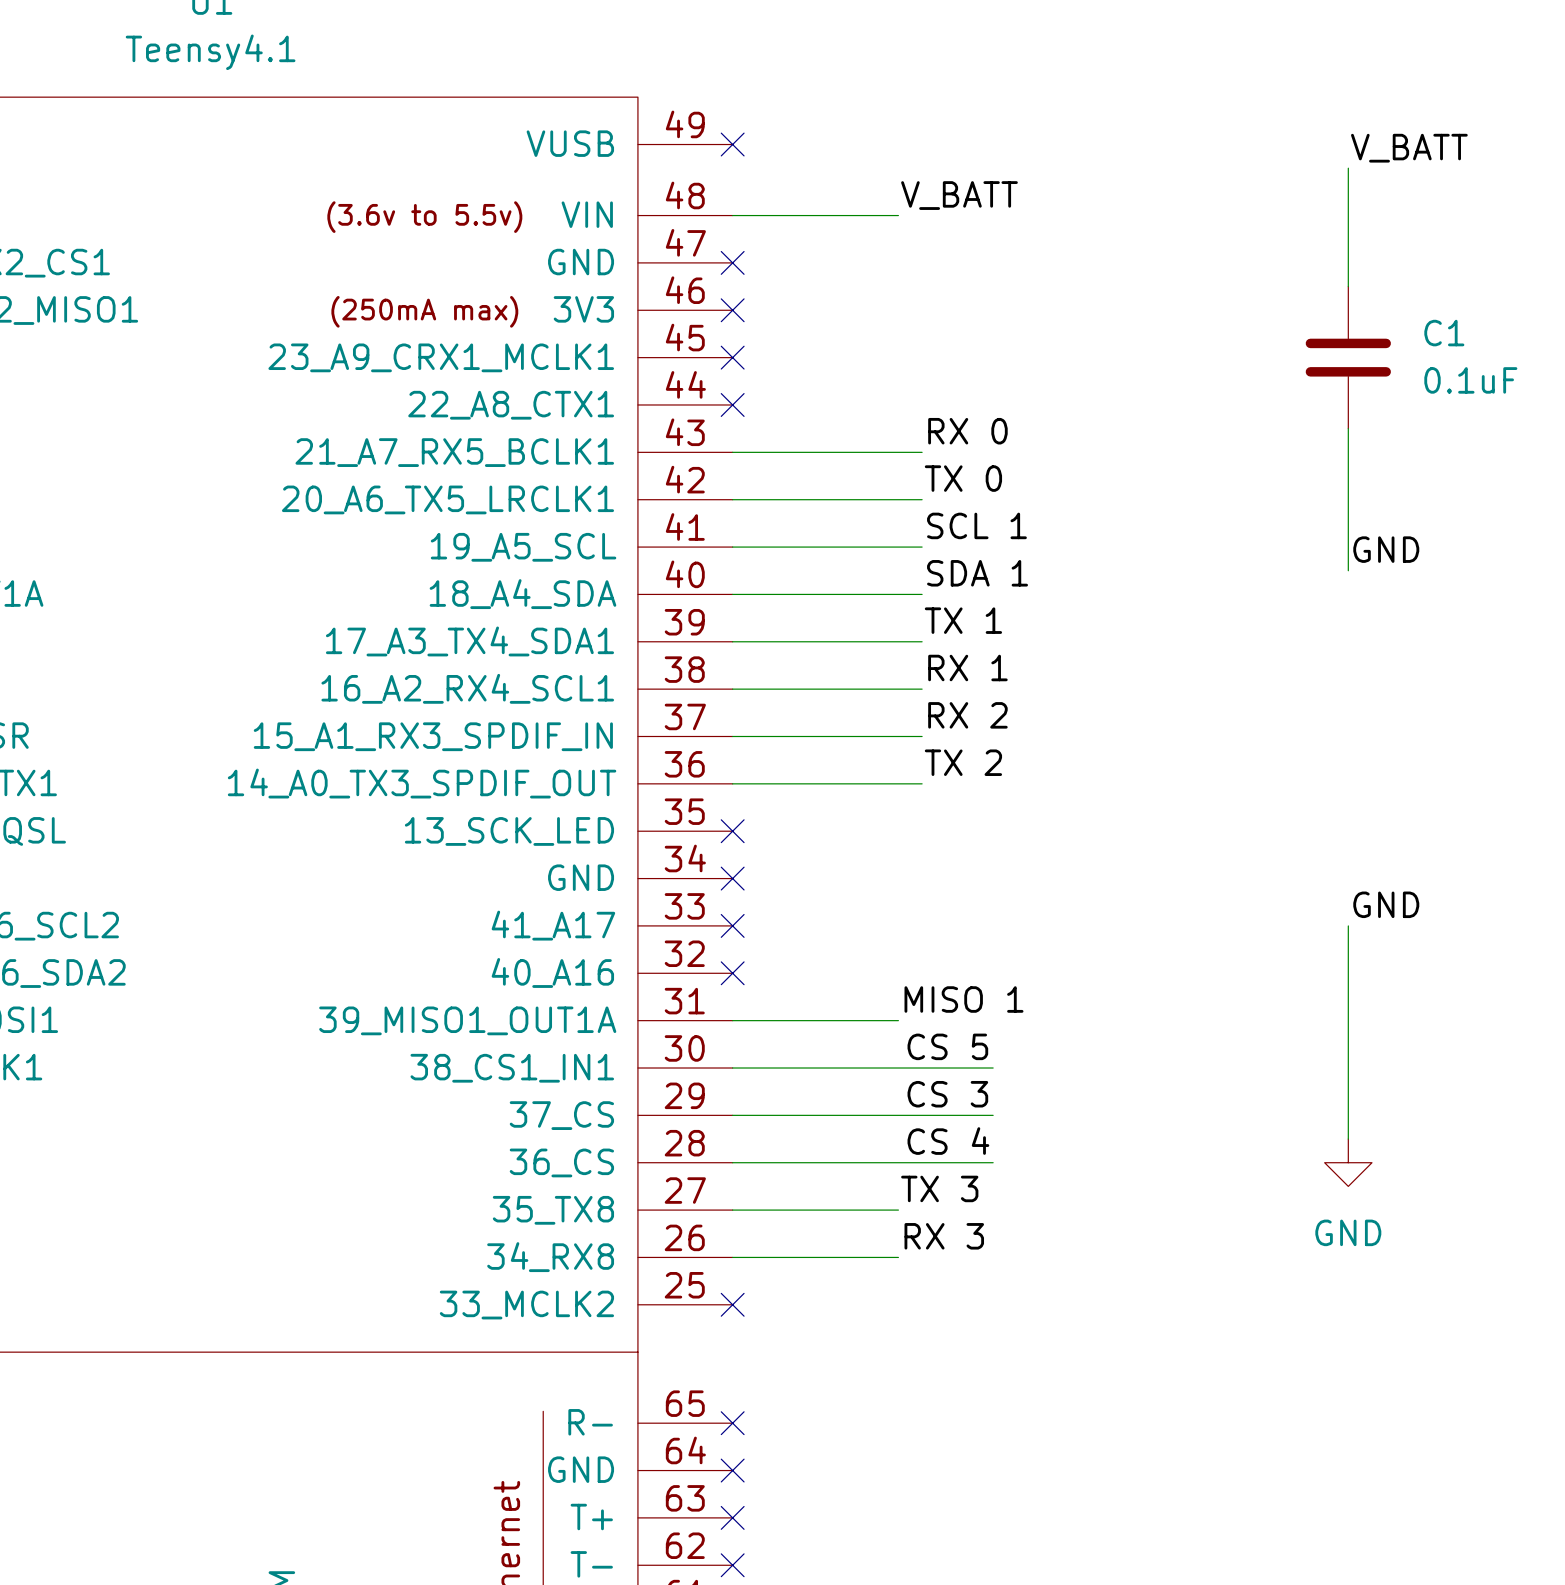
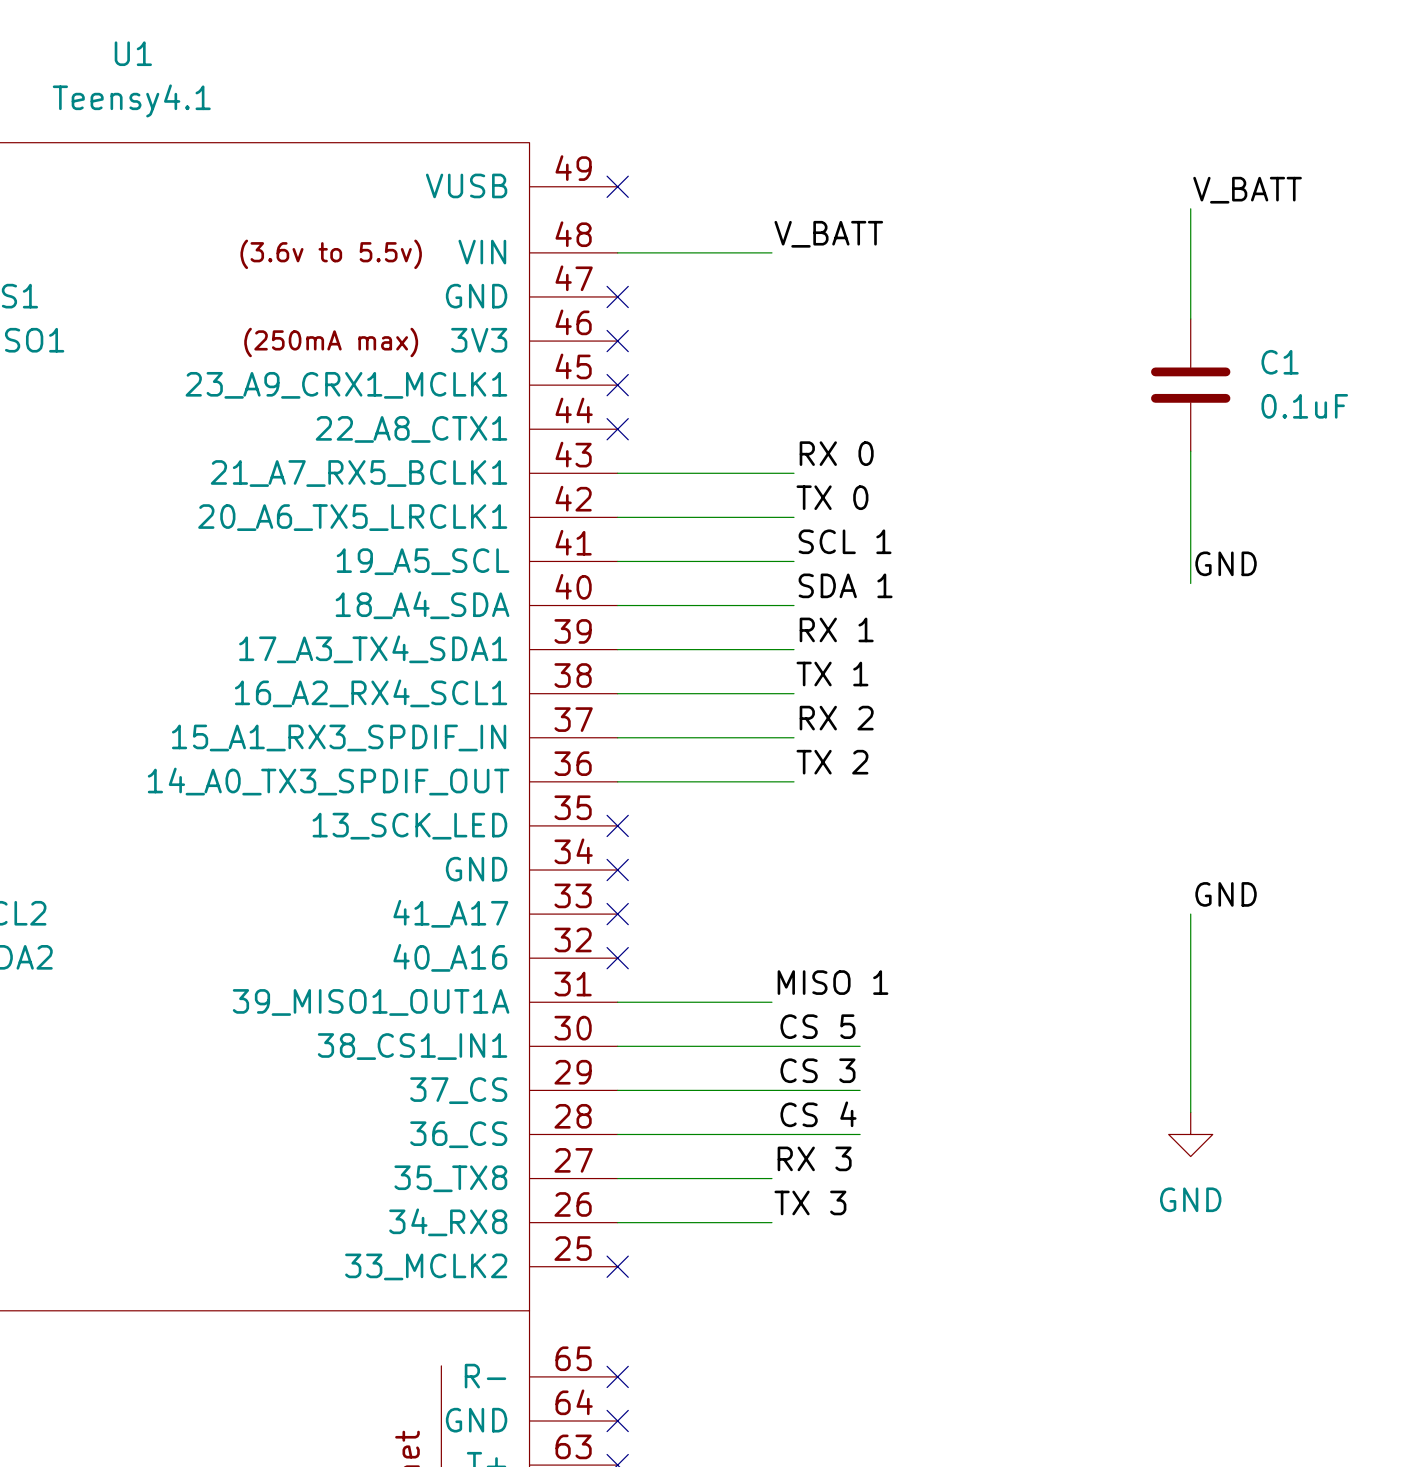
label: TX 1 (963, 620) -> RX 1 (836, 629)
label: RX 1 (967, 668) -> TX 1 (832, 674)
label: TX 3 (939, 1188) -> RX 3 (814, 1158)
label: RX 3 (944, 1236) -> TX 3 (810, 1202)

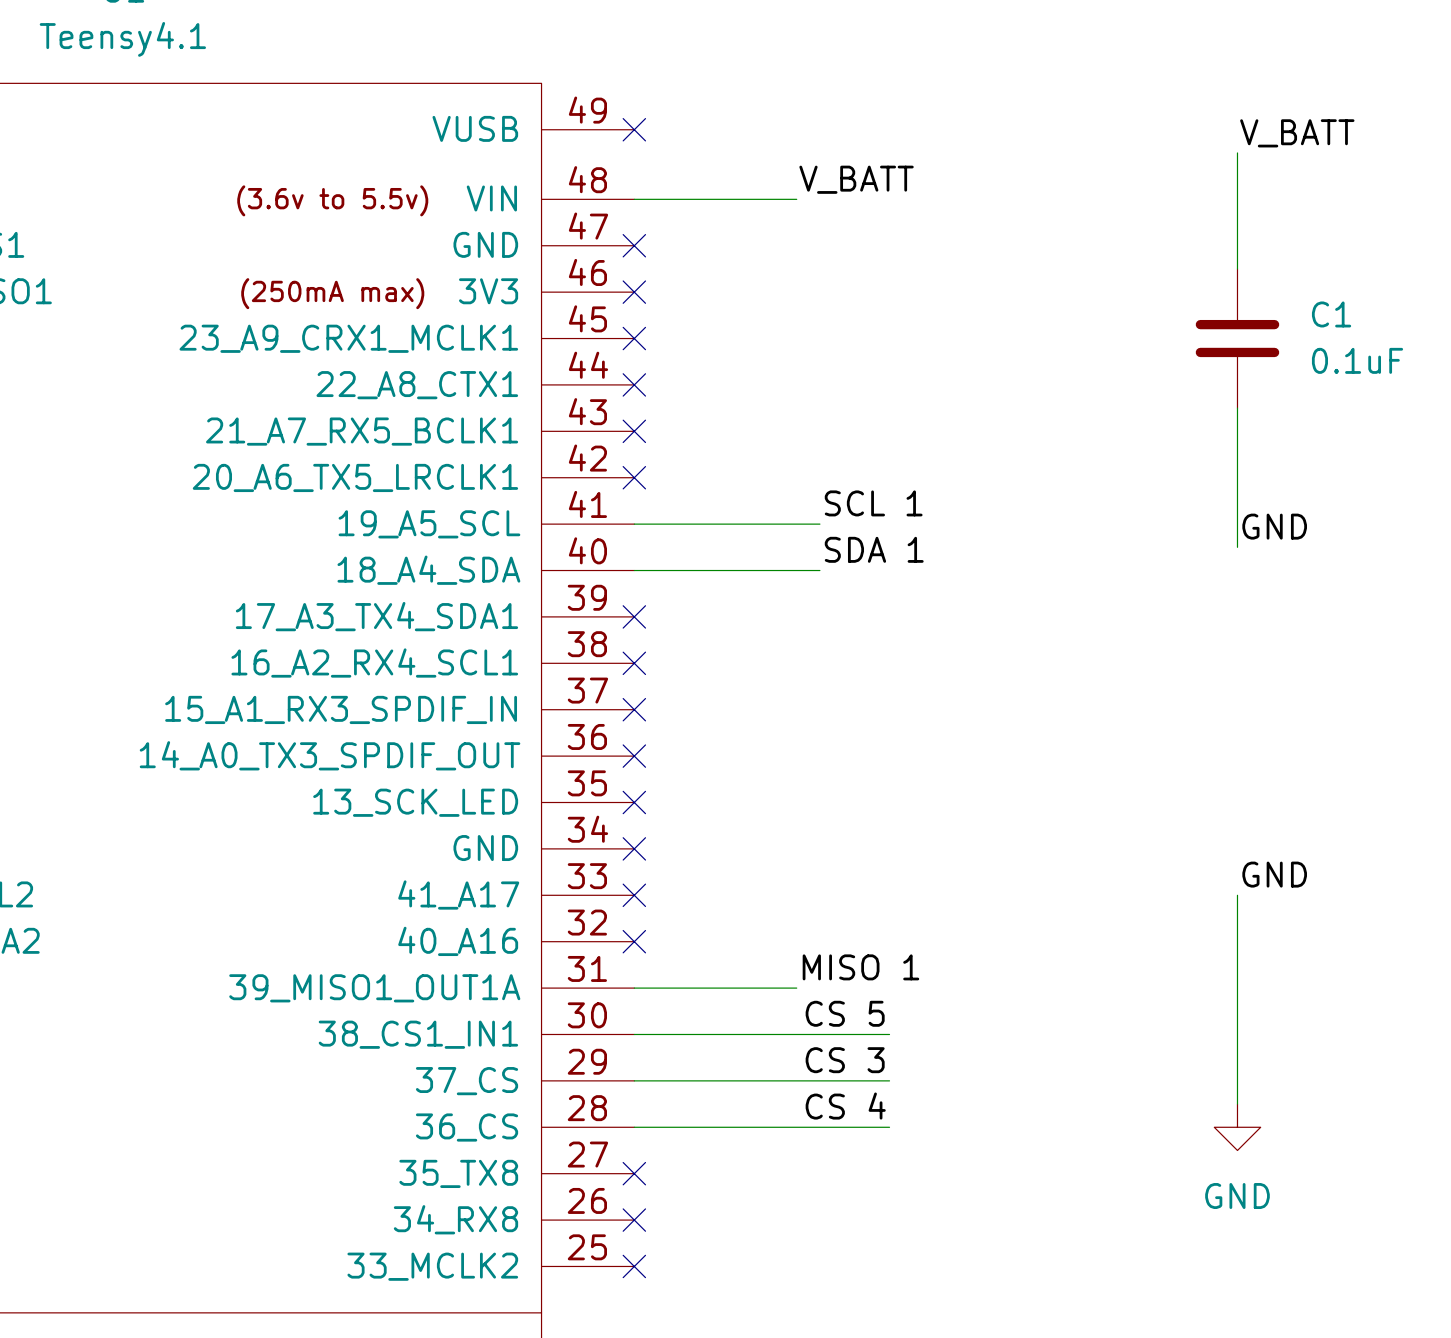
label: RX 0 (836, 453) -> none
wire: (617, 473) (794, 473) -> none
no-connect mark: none -> (634, 431)
label: TX 0 (832, 497) -> none
wire: (617, 517) (794, 517) -> none
no-connect mark: none -> (634, 477)
label: RX 1 (836, 629) -> none
wire: (617, 649) (794, 649) -> none
no-connect mark: none -> (634, 616)
label: TX 1 (832, 674) -> none
wire: (617, 693) (794, 693) -> none
no-connect mark: none -> (634, 663)
label: RX 2 (836, 718) -> none
wire: (617, 737) (794, 737) -> none
no-connect mark: none -> (634, 709)
label: TX 2 (832, 762) -> none
wire: (617, 781) (794, 781) -> none
no-connect mark: none -> (634, 756)
label: RX 3 (814, 1158) -> none
wire: (617, 1178) (771, 1178) -> none
no-connect mark: none -> (634, 1173)
label: TX 3 (810, 1202) -> none
wire: (617, 1222) (771, 1222) -> none
no-connect mark: none -> (634, 1220)

